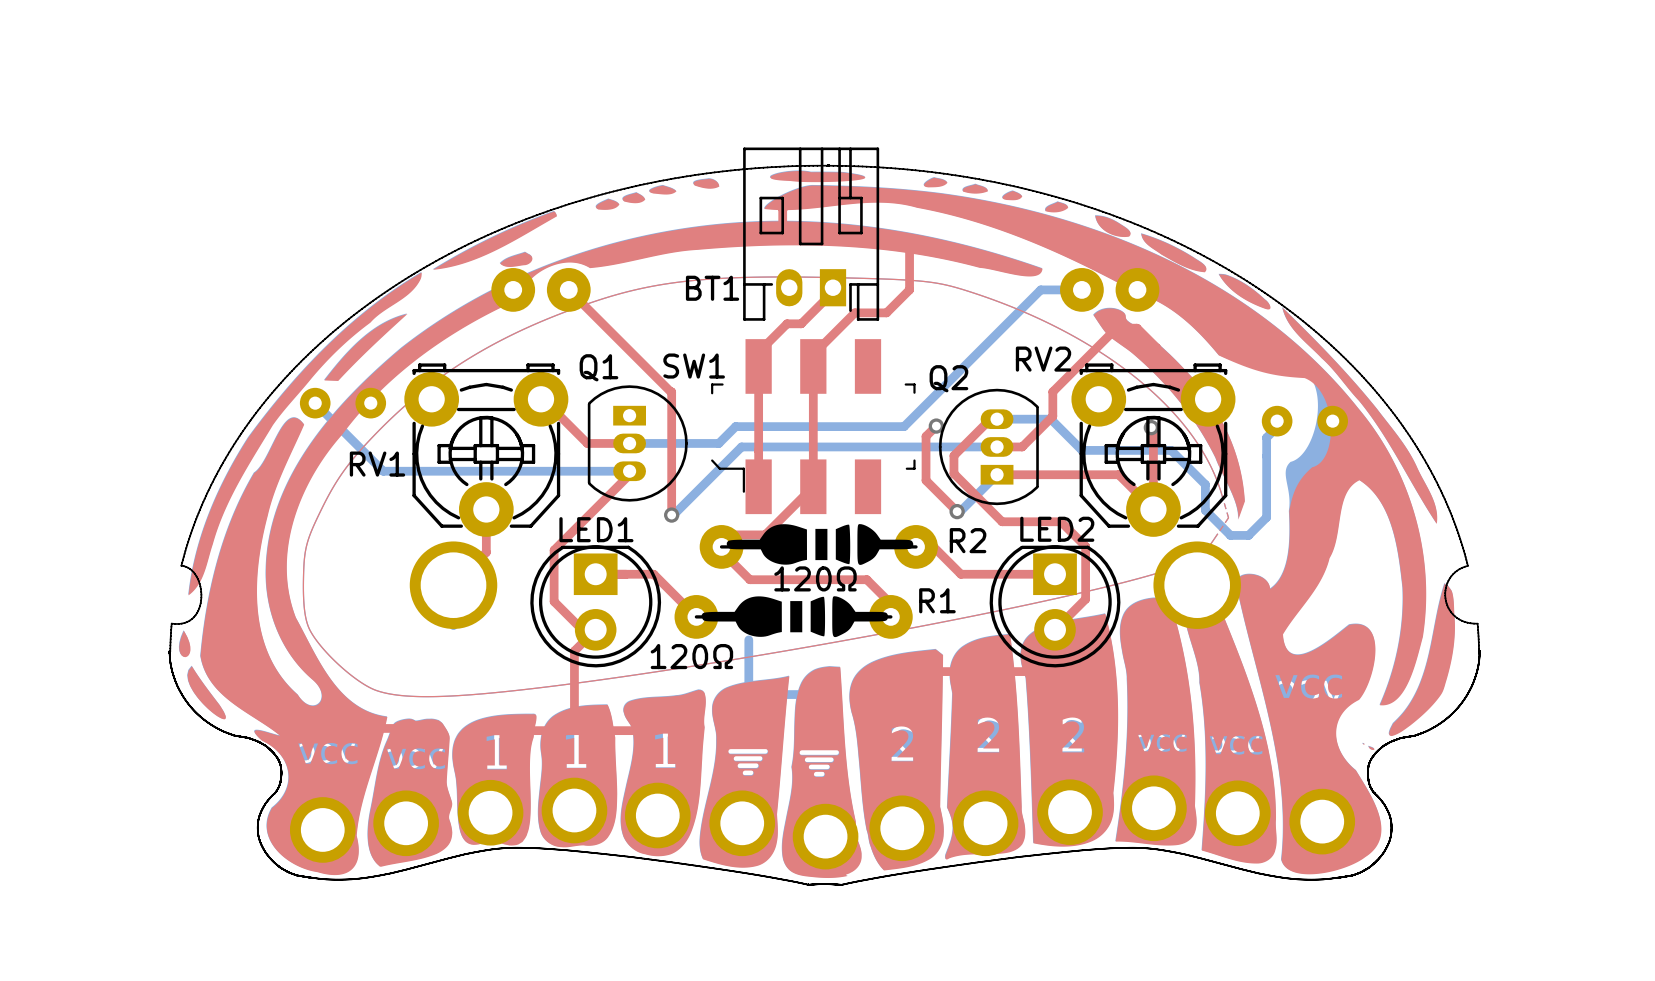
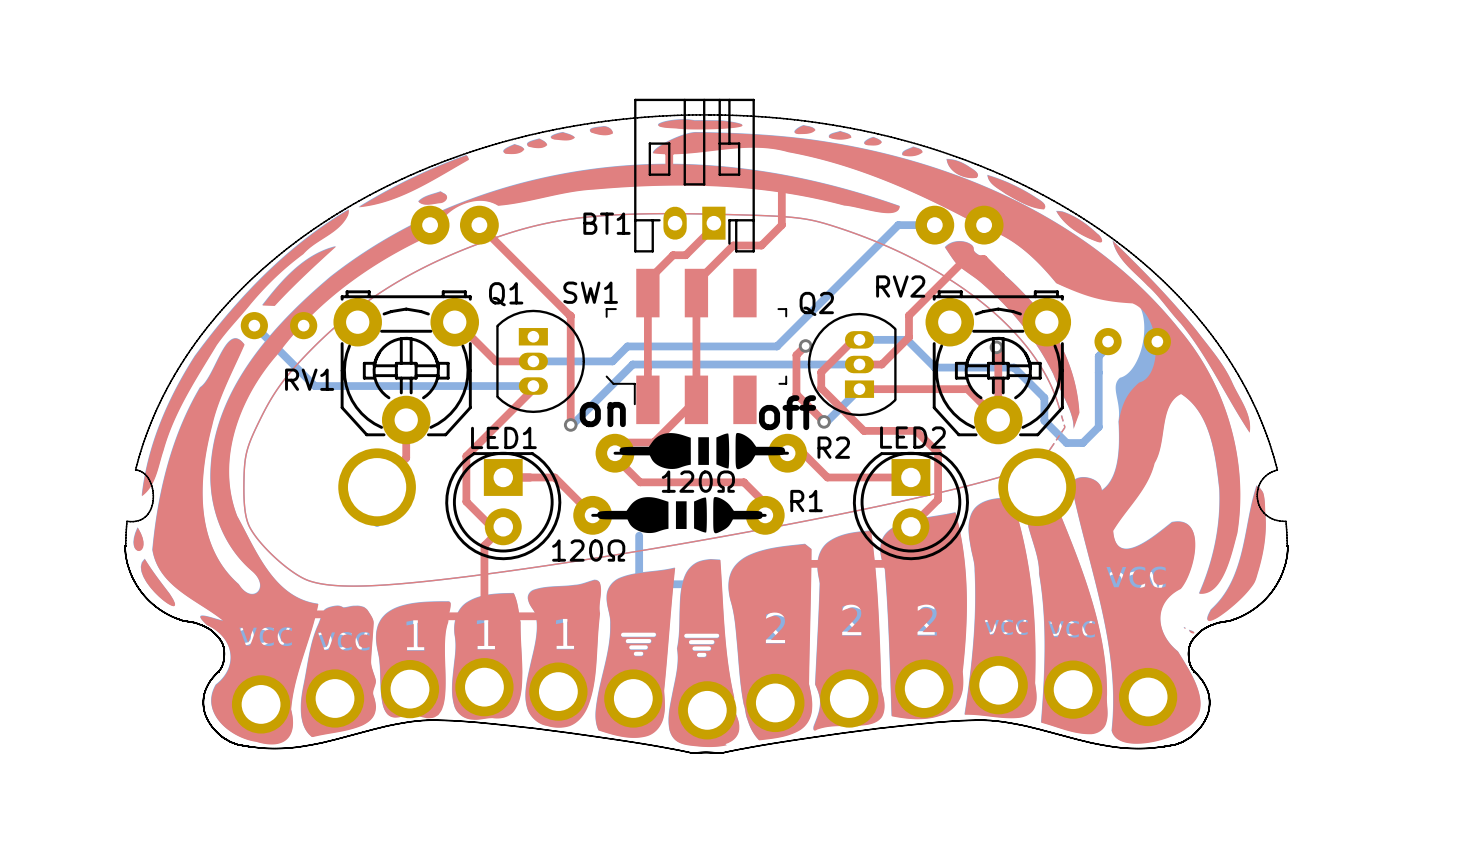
text: none -> off (787, 412)
text: none -> on (602, 414)

